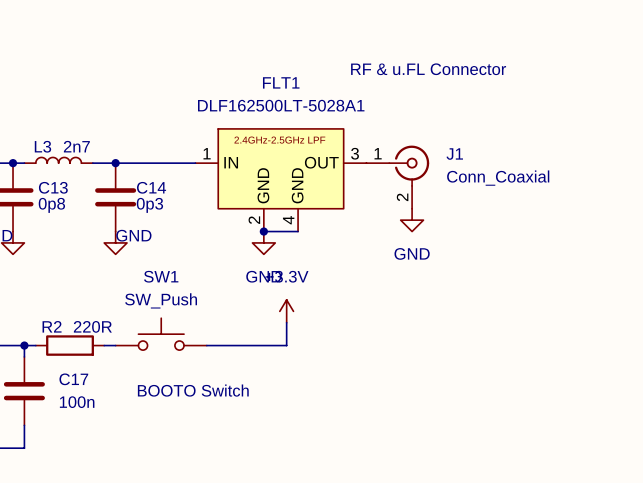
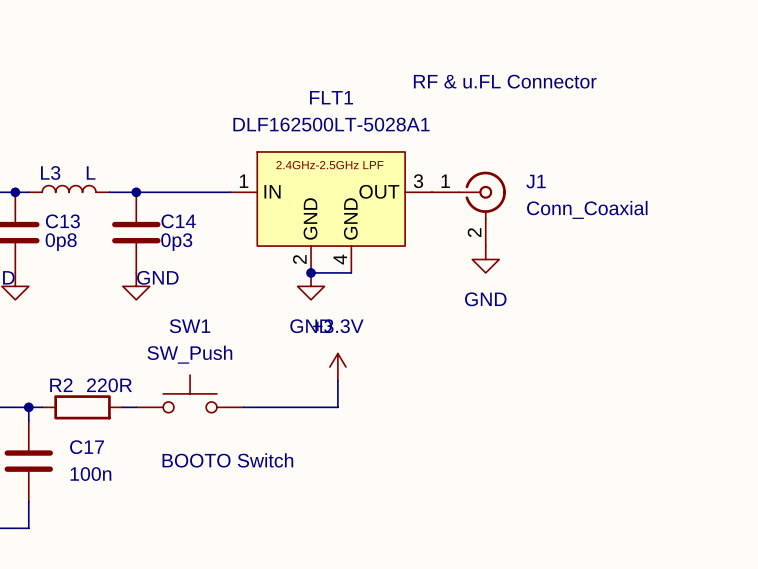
L3 value: 2n7 (76, 146) -> L (91, 172)

